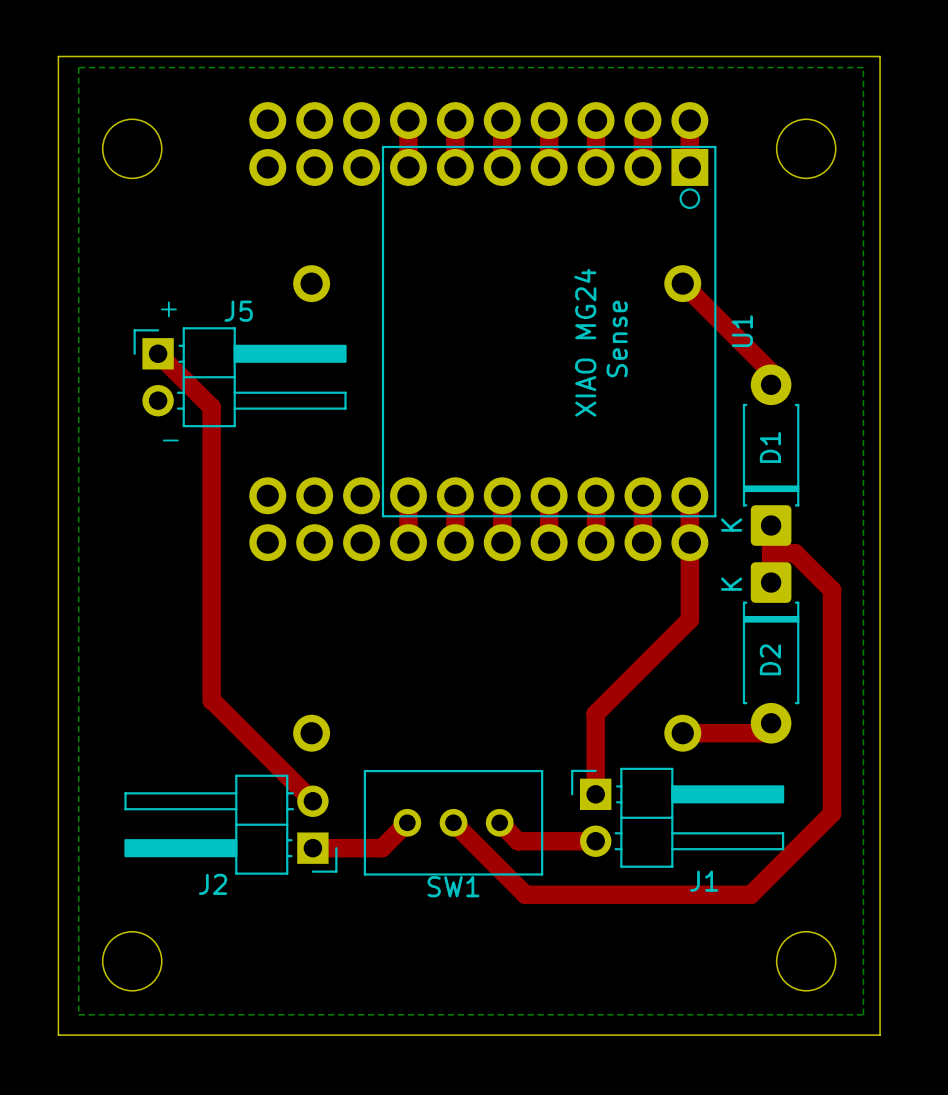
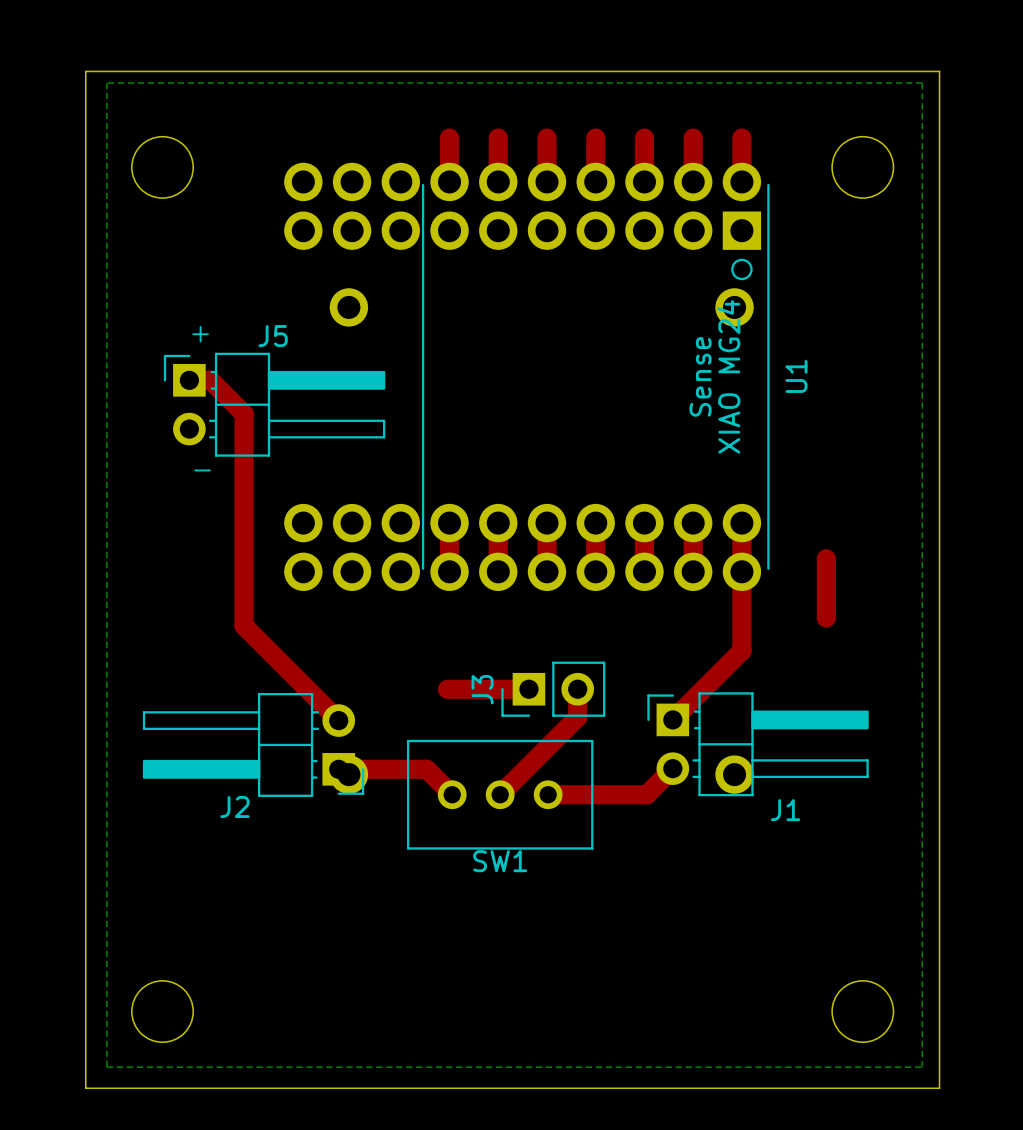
U1 footprint: [249, 102, 717, 562] -> [284, 162, 770, 591]
top track: (682, 283) (771, 371) (771, 384) -> none
top track: (158, 353) (211, 407) (211, 700) (312, 801) -> (189, 380) (210, 380) (244, 413) (244, 625) (338, 720)
D1: (771, 455) -> none
top track: (771, 553) (795, 553) (832, 590) (832, 813) (750, 894) (525, 894) (453, 822) -> none
top track: (689, 614) (689, 619) (595, 713) (595, 794) -> (741, 650) (672, 719)
top track: none -> (447, 689) (528, 689)
J3: none -> (553, 689)
top track: none -> (577, 689) (577, 717) (500, 794)
D2: (771, 652) -> none
top track: (771, 723) (761, 733) (682, 733) -> none
top track: none -> (672, 768) (646, 794) (548, 794)
top track: none -> (338, 769) (426, 769) (452, 794)
J1 position: (677, 817) -> (758, 744)
top track: (407, 822) (381, 848) (312, 848) -> none
SW1 position: (453, 822) -> (500, 794)
top track: (499, 822) (518, 841) (595, 841) -> none
J2 position: (230, 824) -> (253, 744)

